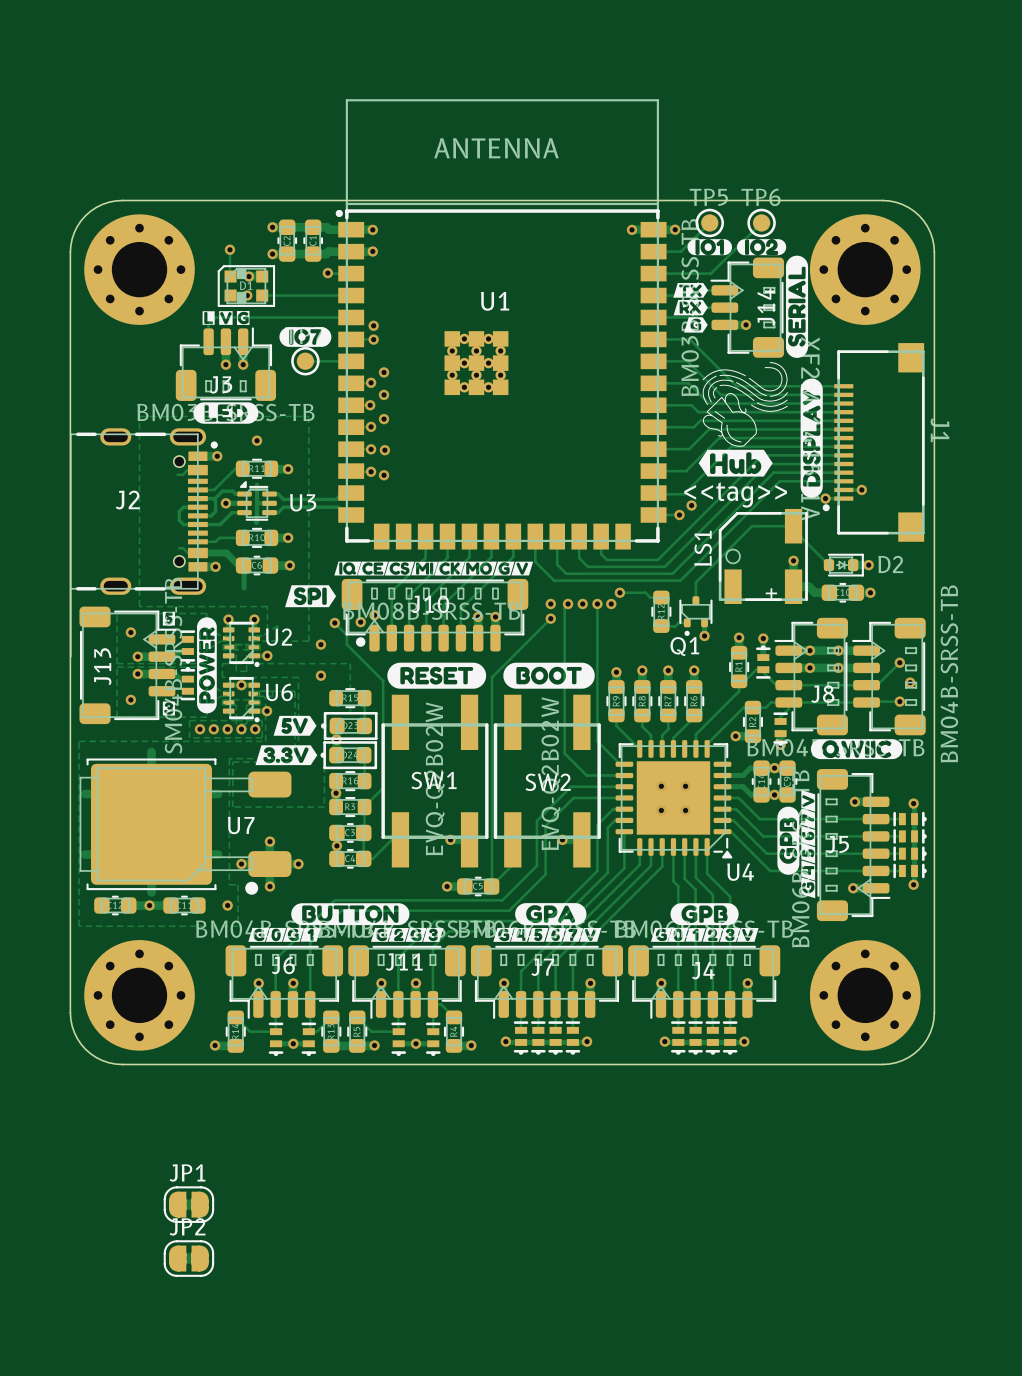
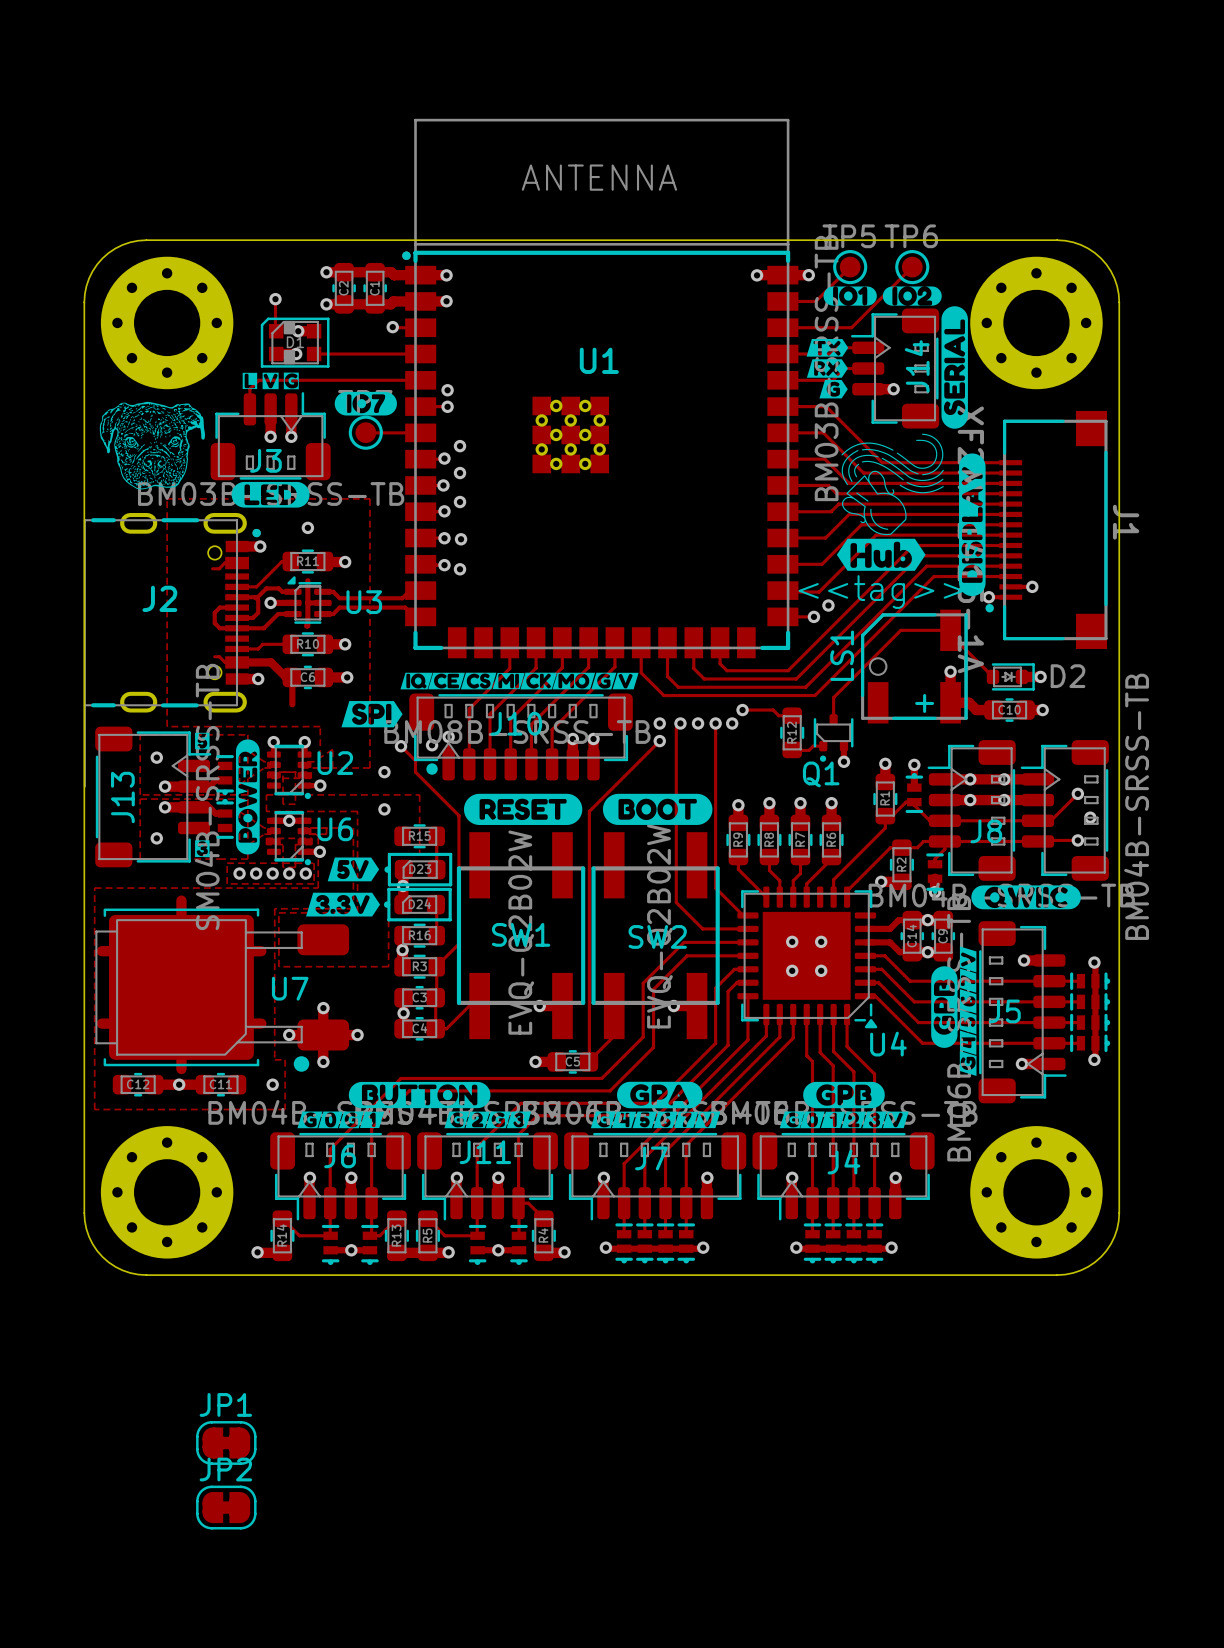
drawing: none -> [99, 401, 205, 490]

